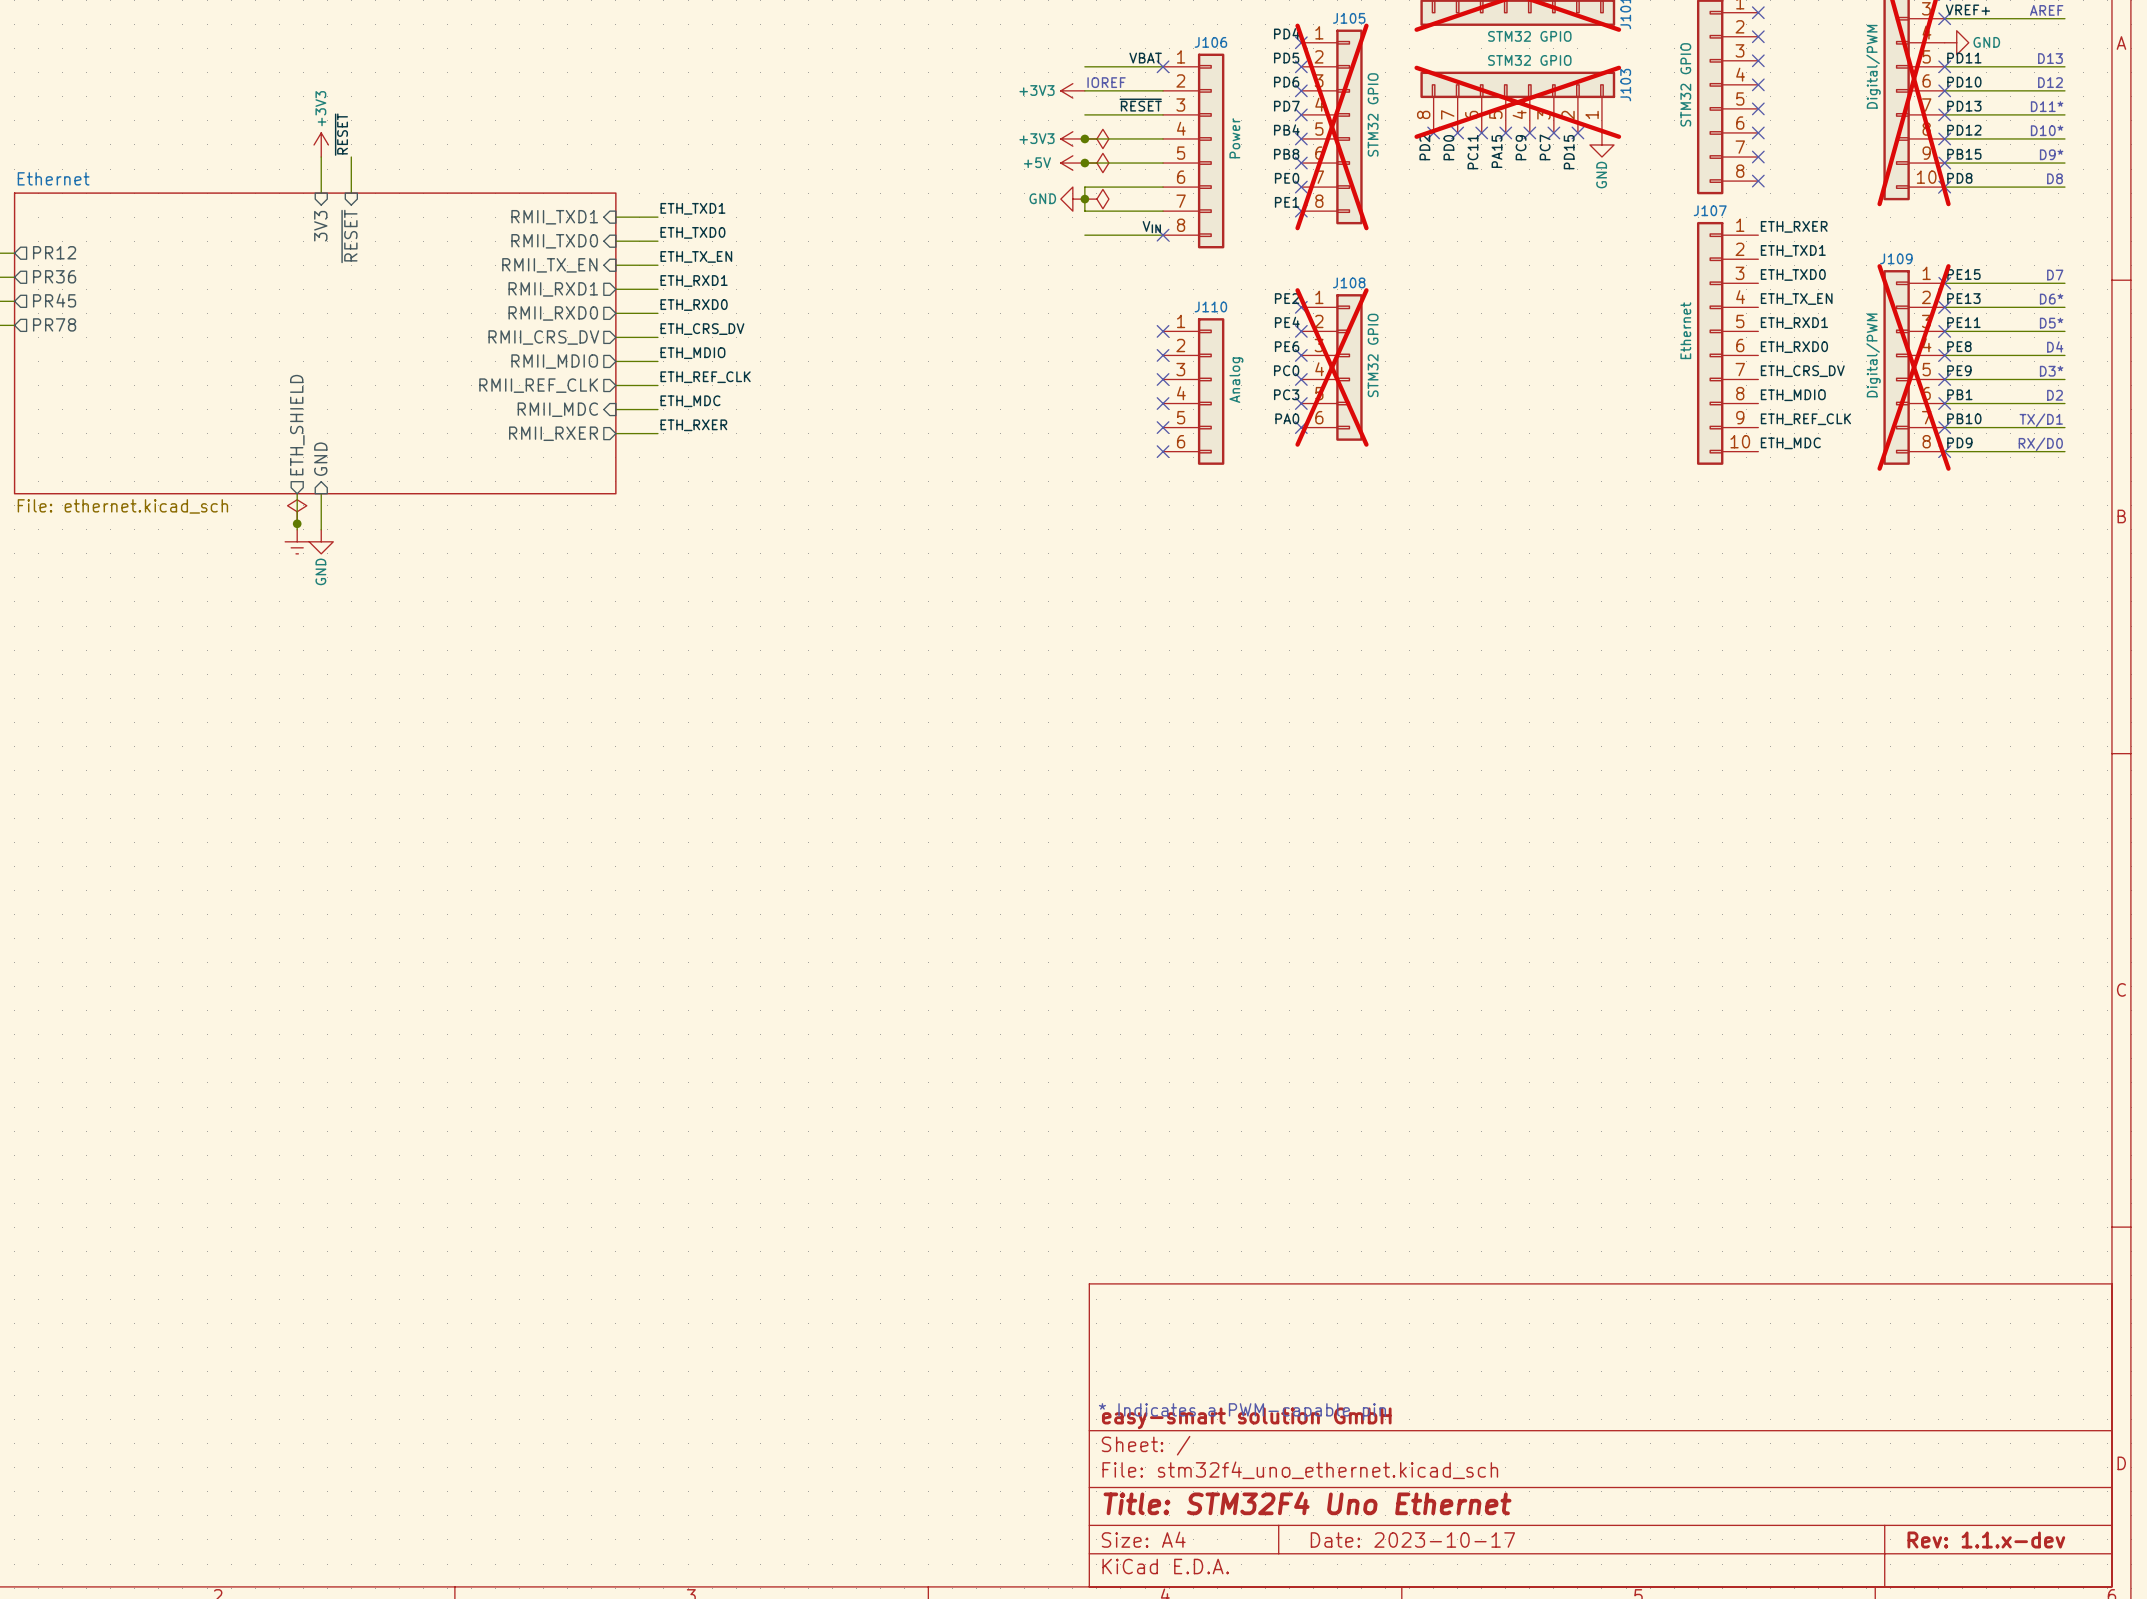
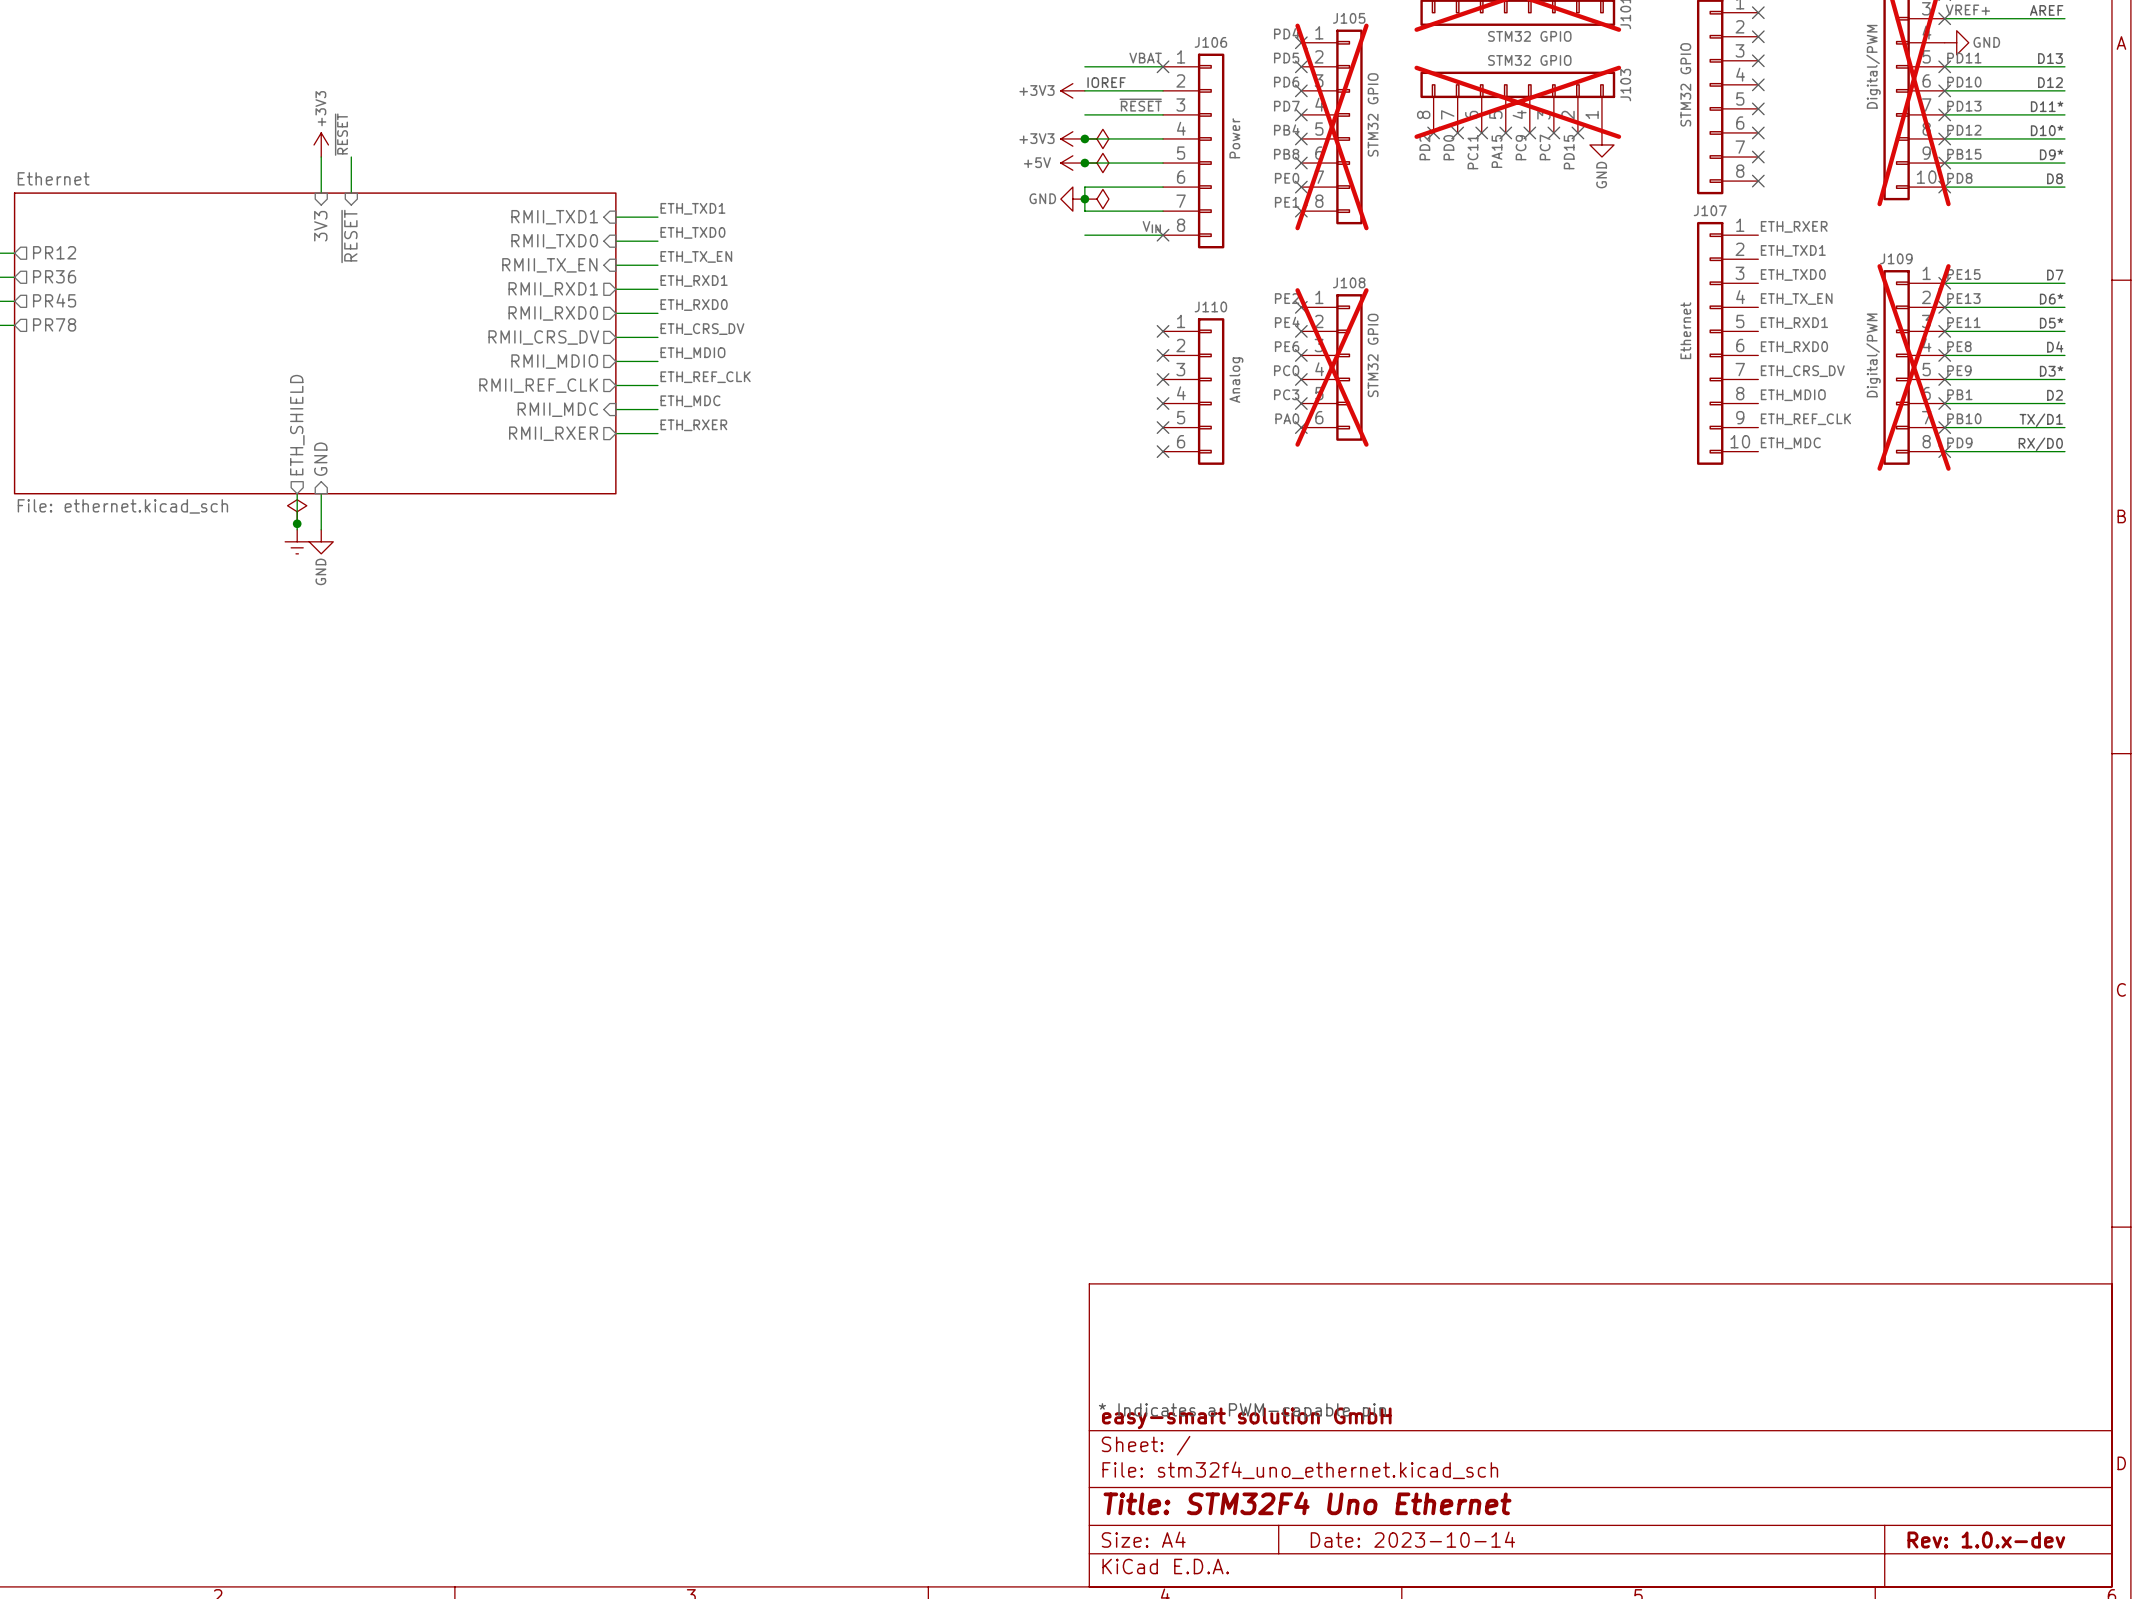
title block: Date: 2023-10-17 (1412, 1539) -> Date: 2023-10-14 (1412, 1539)
title block: Rev: 1.1.x-dev (1986, 1539) -> Rev: 1.0.x-dev (1986, 1539)

